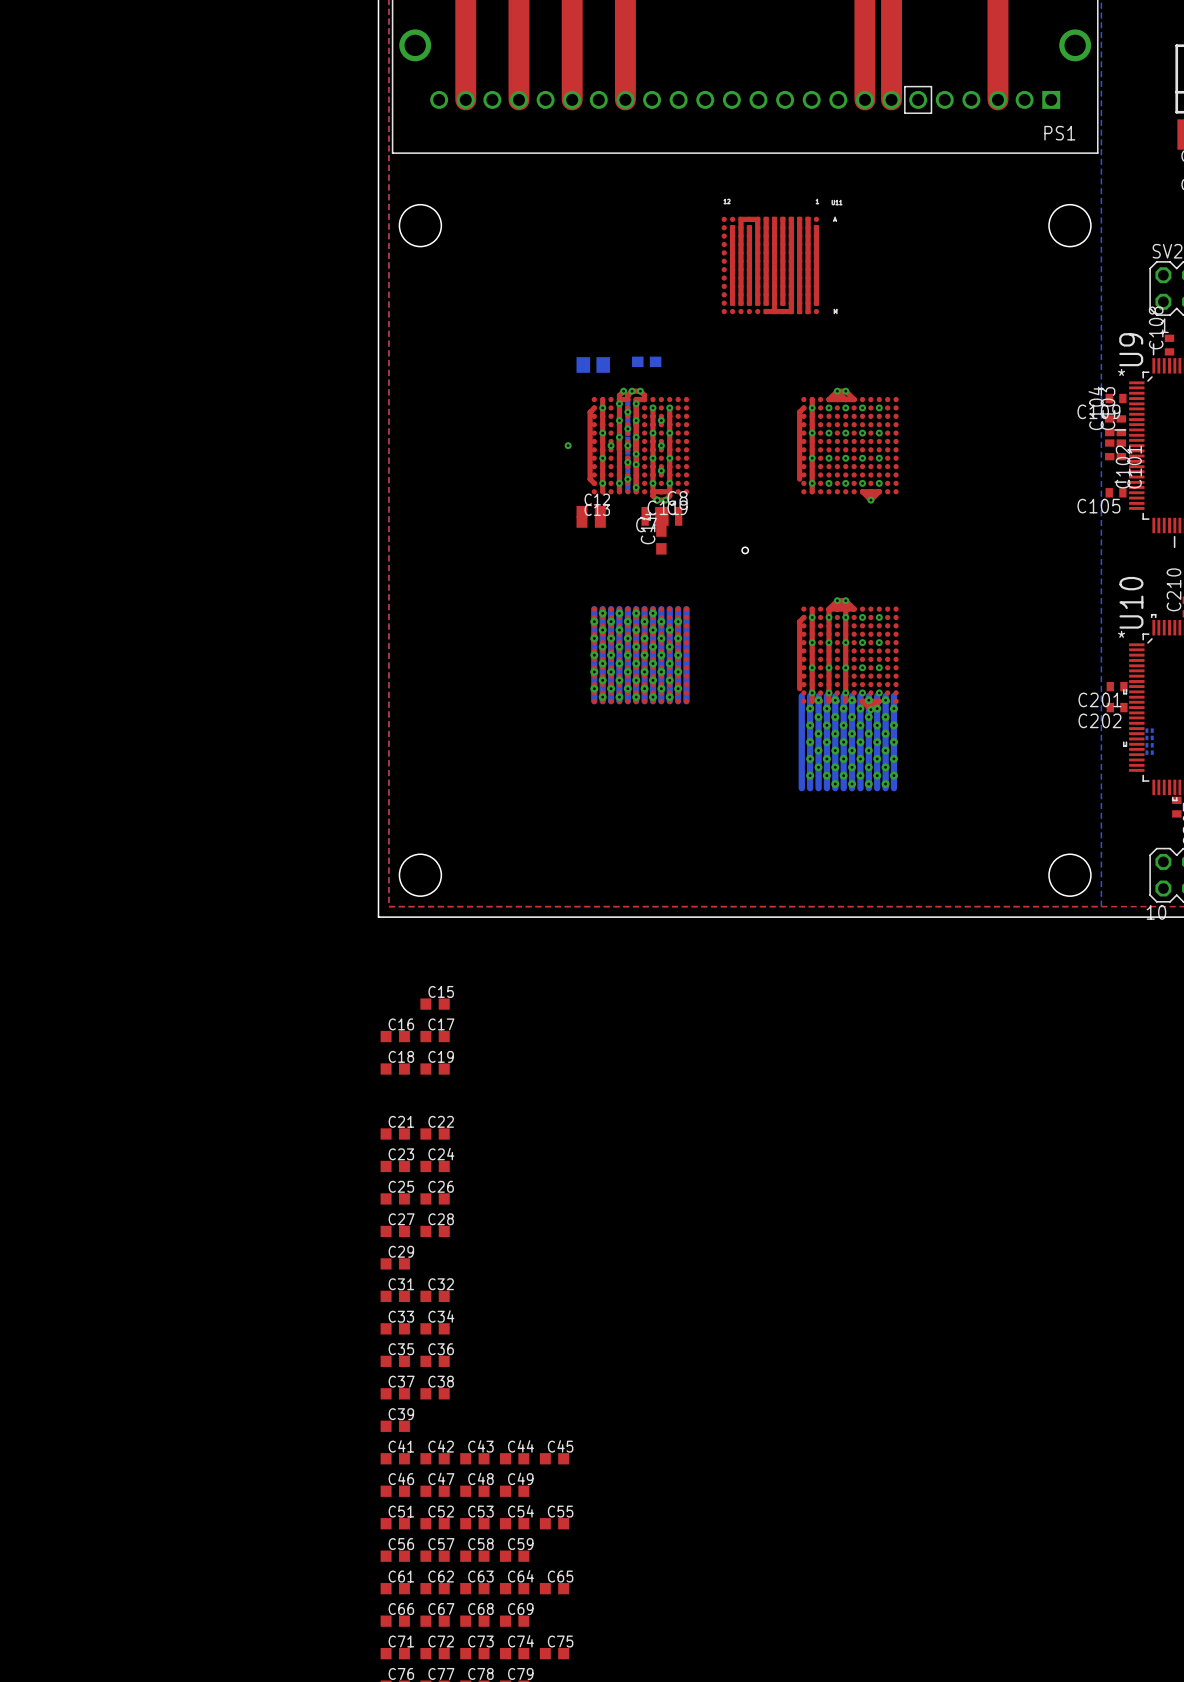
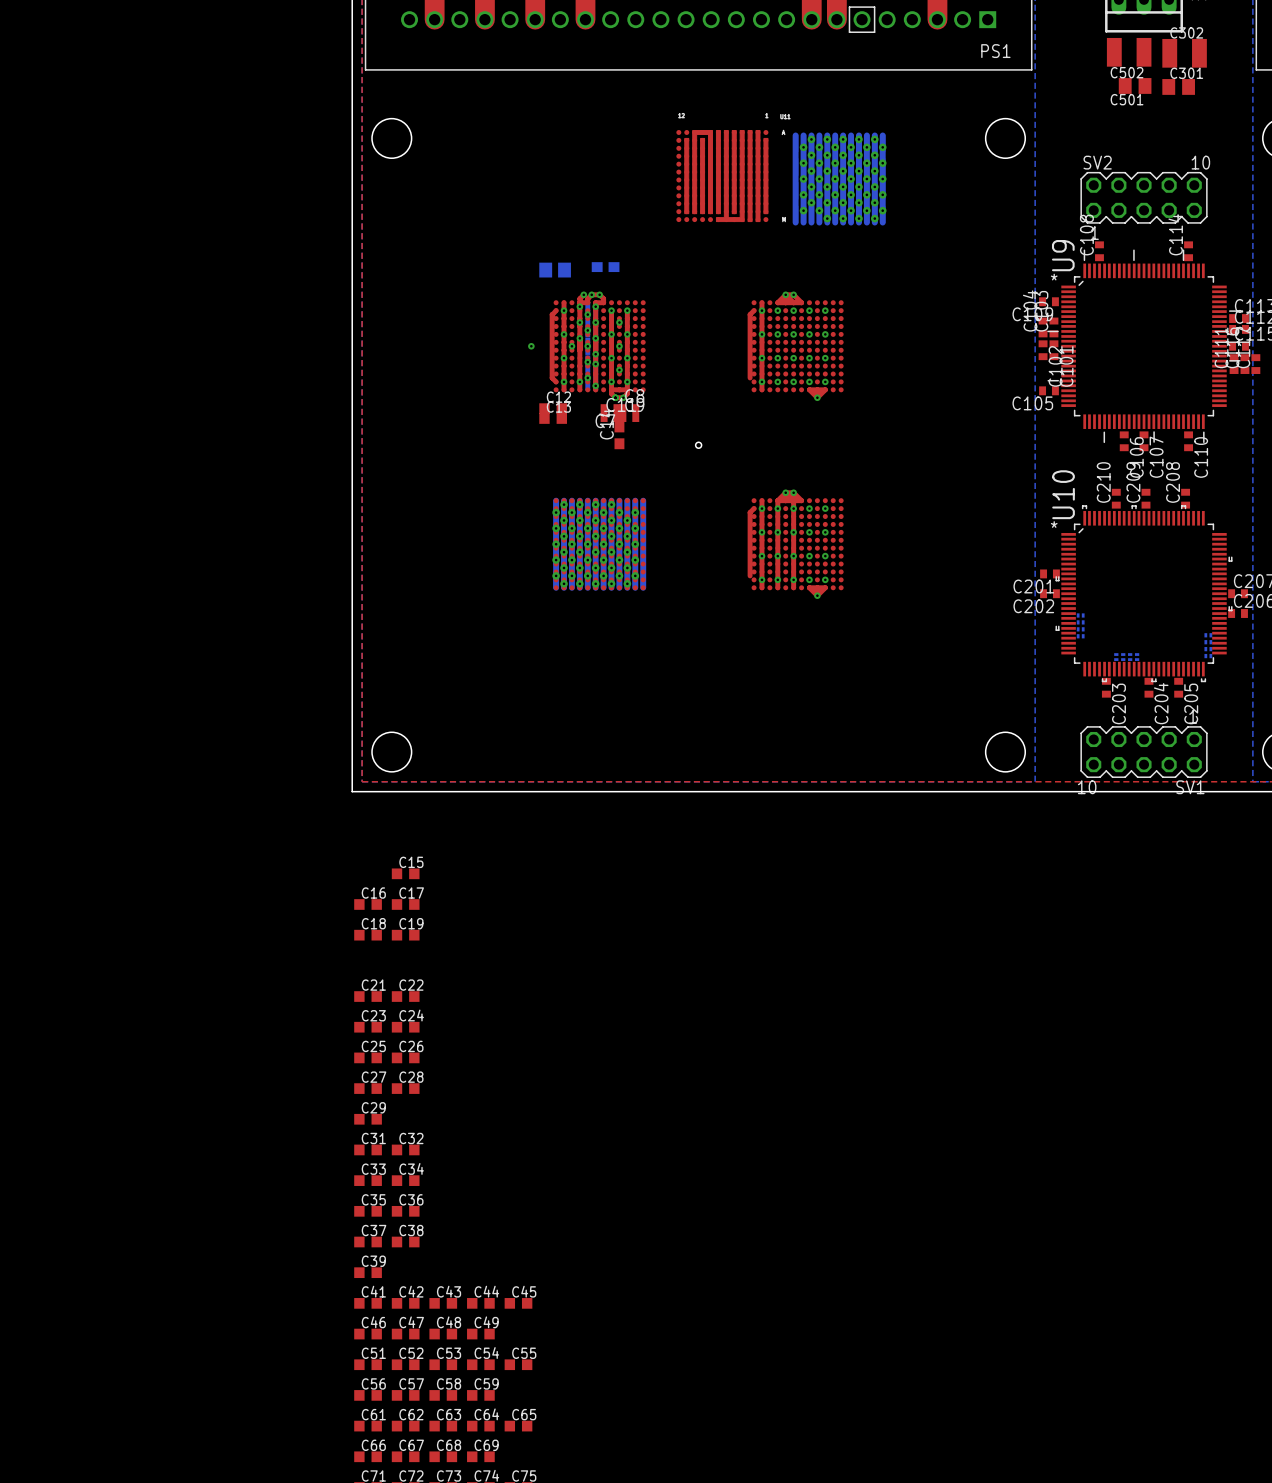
part: none -> (839, 179)
part: (848, 742) -> none

